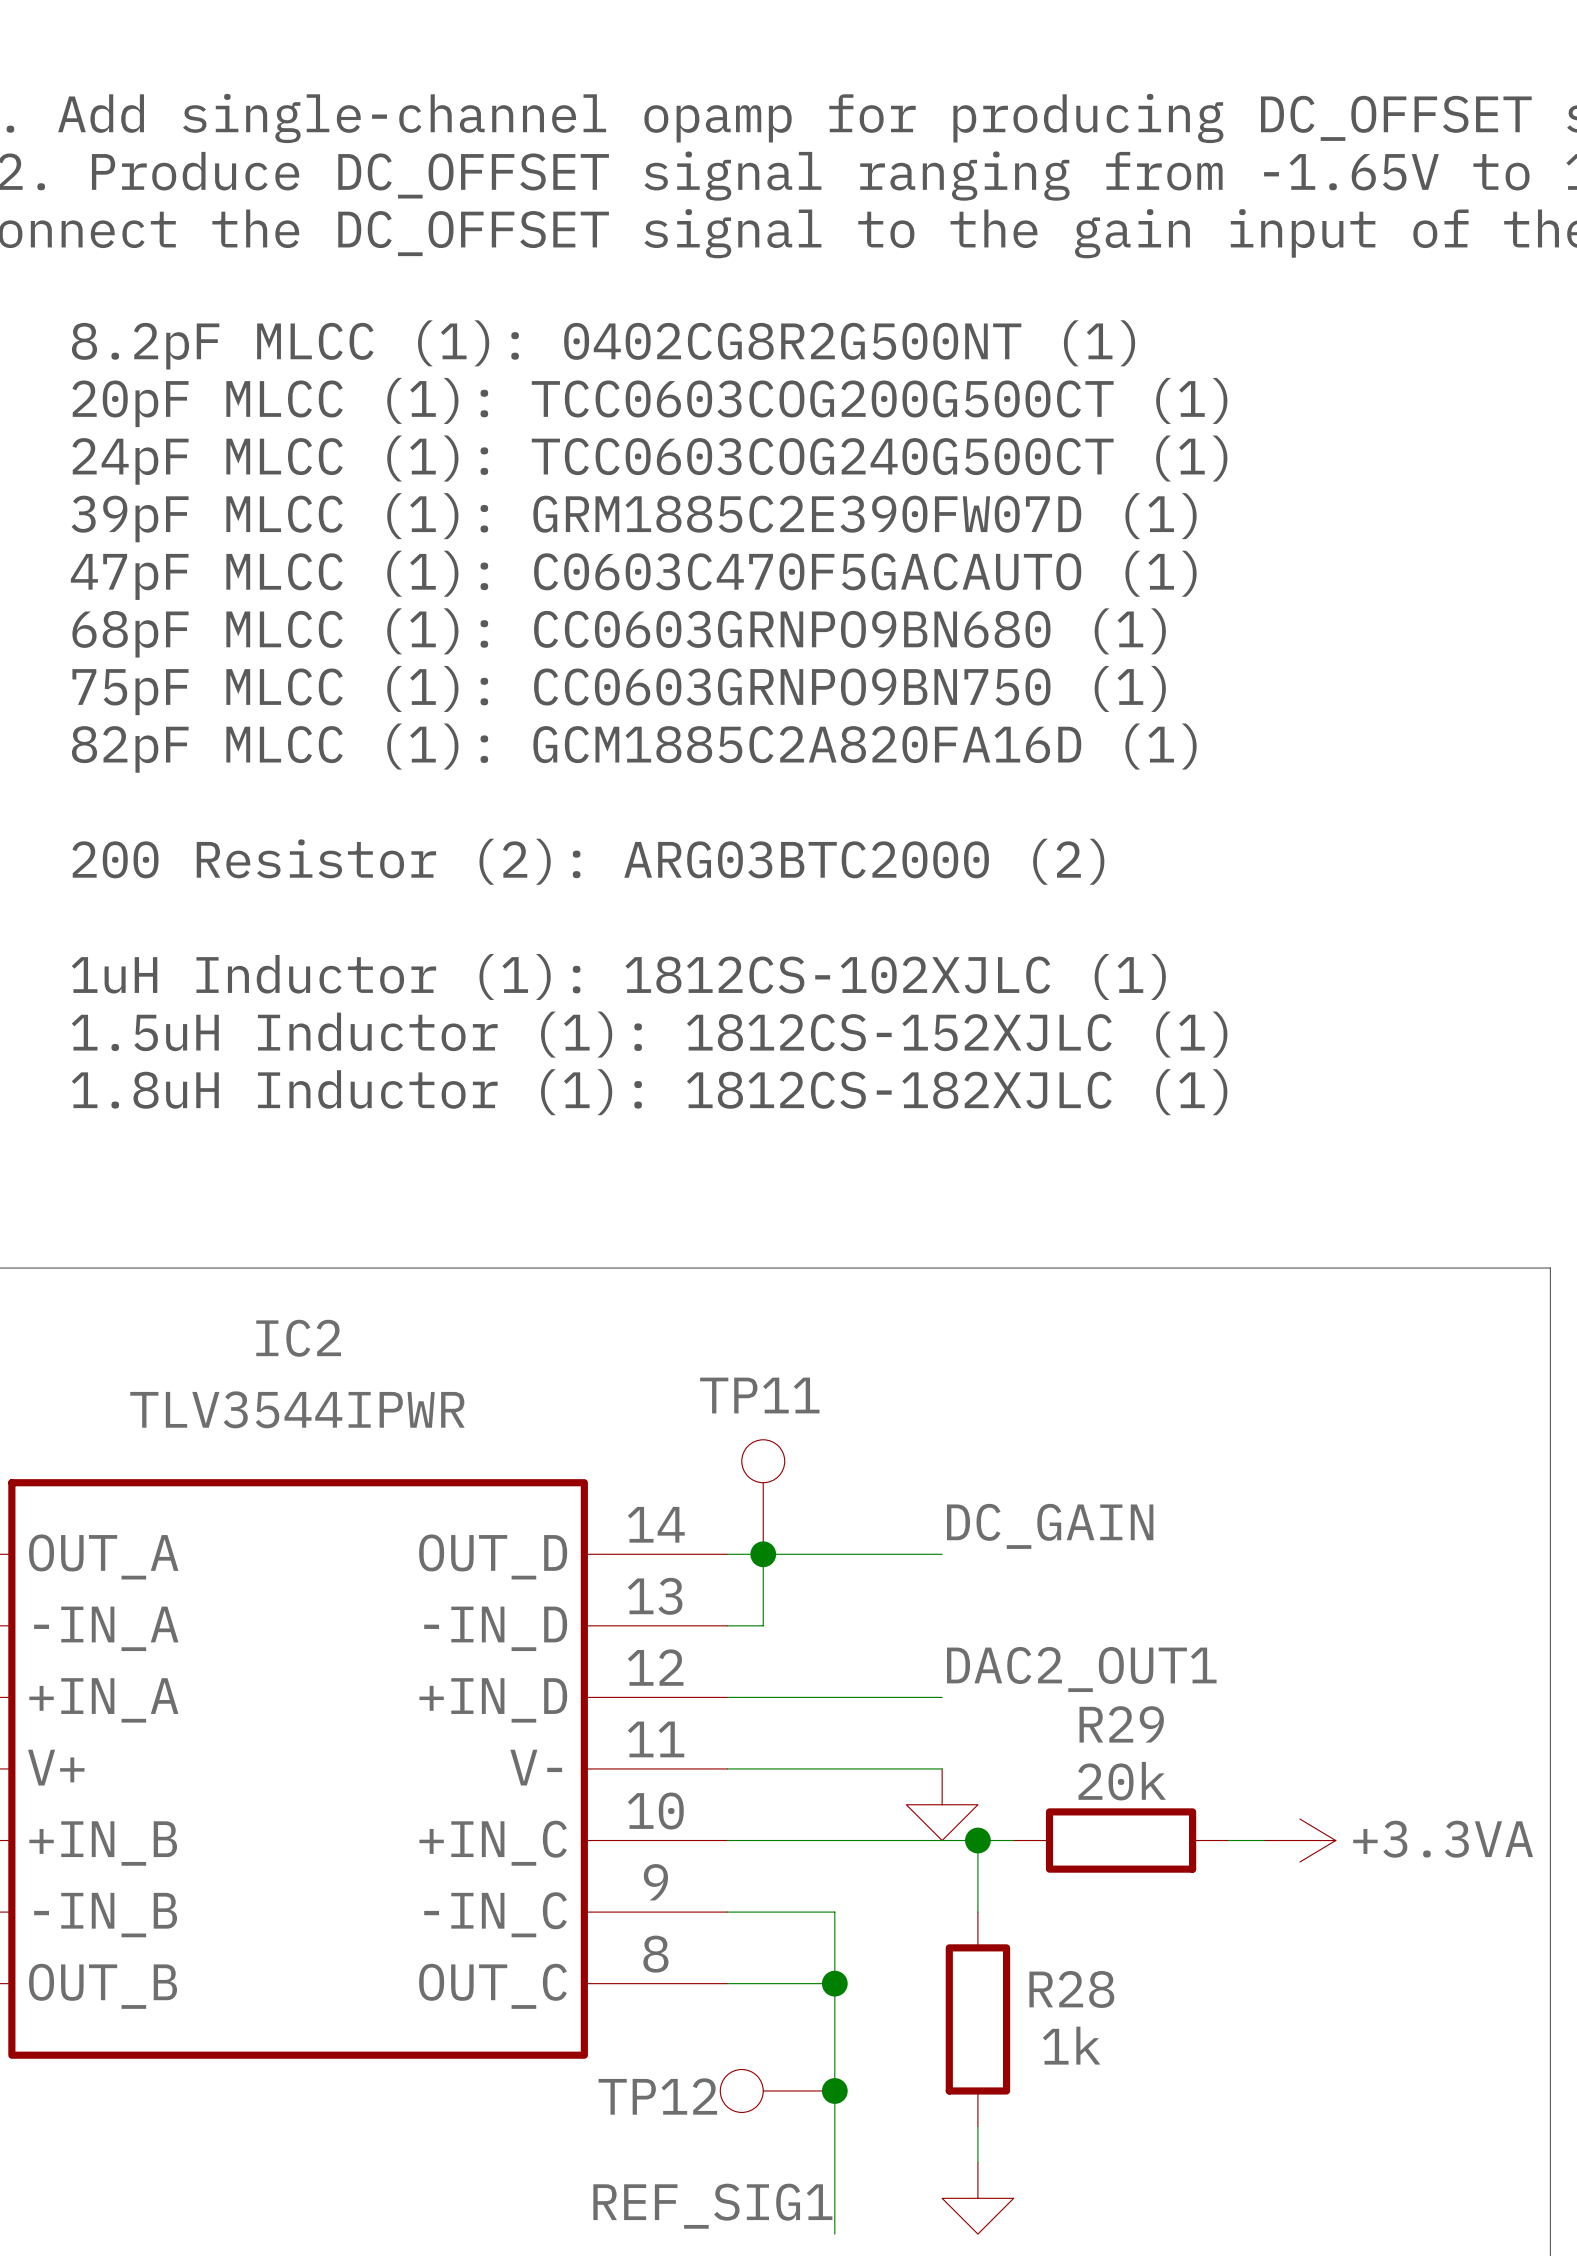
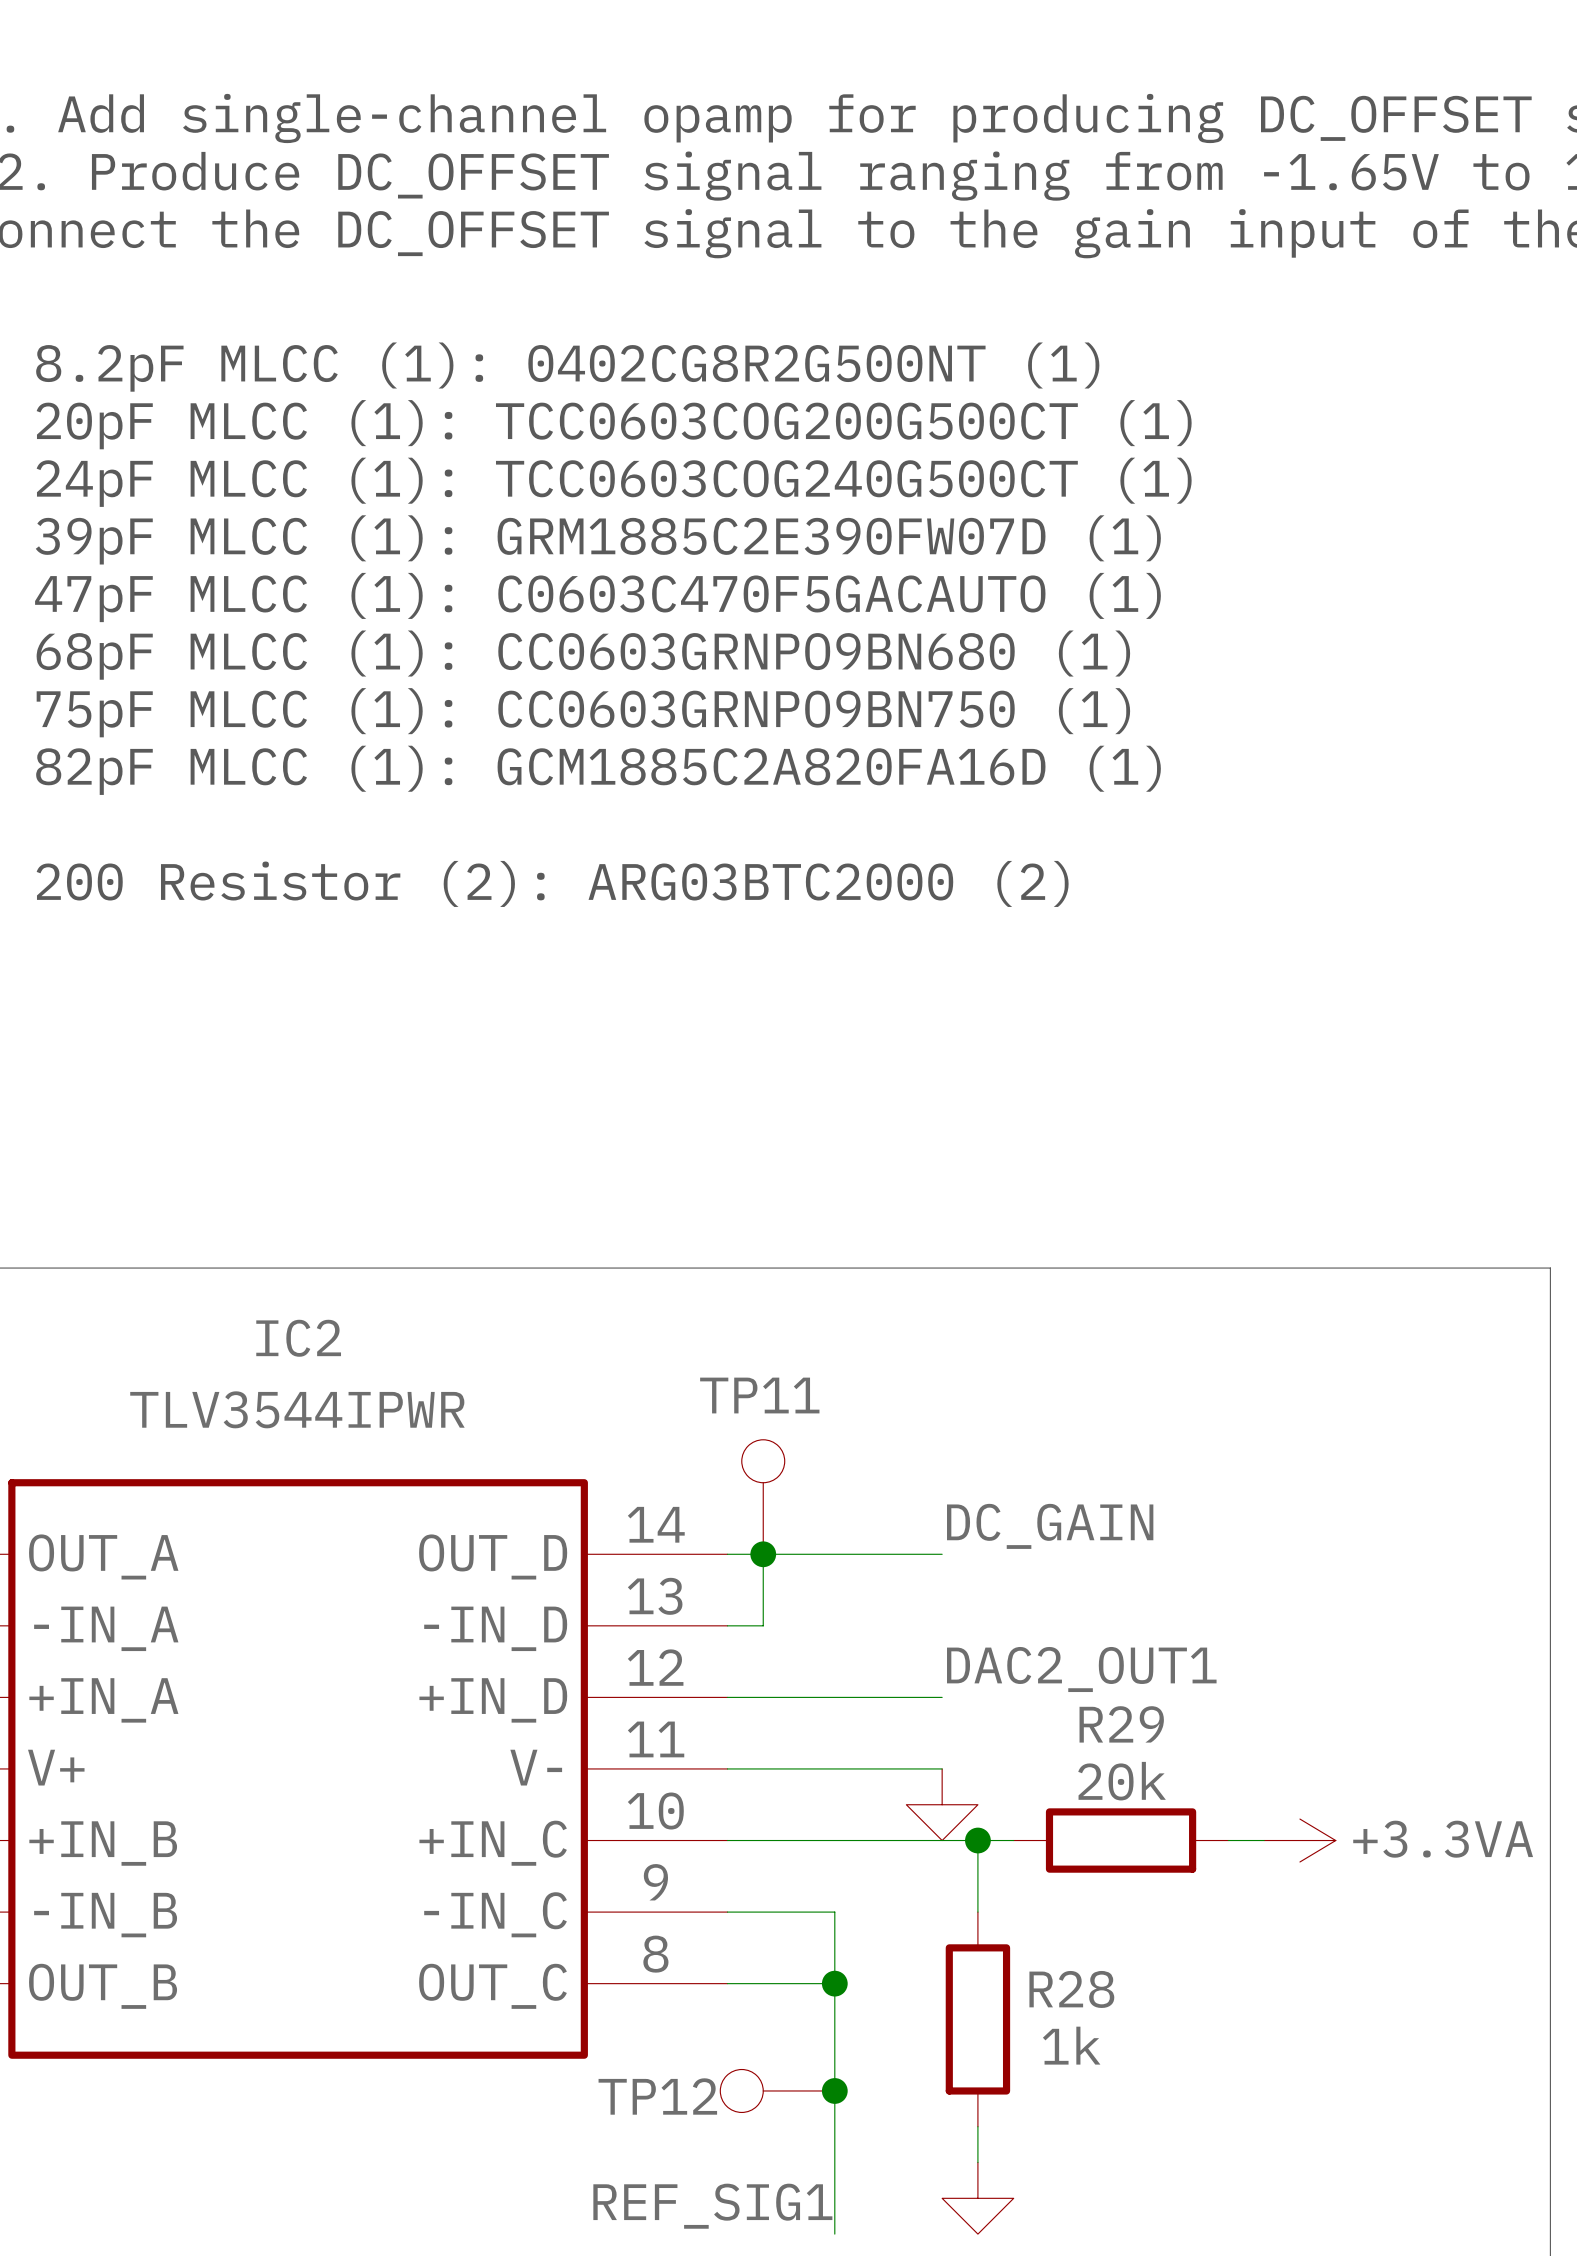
text position: 8.2pF MLCC (1): 0402CG8R2G500NT (1) (603, 344) -> 8.2pF MLCC (1): 0402CG8R2G500NT (1) (567, 367)
text position: 20pF MLCC (1): TCC0603COG200G500CT (1) (649, 402) -> 20pF MLCC (1): TCC0603COG200G500CT (1) (614, 424)
text position: 24pF MLCC (1): TCC0603COG240G500CT (1) (649, 460) -> 24pF MLCC (1): TCC0603COG240G500CT (1) (614, 482)
text position: 39pF MLCC (1): GRM1885C2E390FW07D (1) (634, 517) -> 39pF MLCC (1): GRM1885C2E390FW07D (1) (598, 539)
text position: 47pF MLCC (1): C0603C470F5GACAUTO (1) (633, 575) -> 47pF MLCC (1): C0603C470F5GACAUTO (1) (597, 597)
text position: 68pF MLCC (1): CC0603GRNPO9BN680 (1) (619, 632) -> 68pF MLCC (1): CC0603GRNPO9BN680 (1) (583, 655)
text position: 75pF MLCC (1): CC0603GRNPO9BN750 (1) (619, 690) -> 75pF MLCC (1): CC0603GRNPO9BN750 (1) (583, 712)
text position: 82pF MLCC (1): GCM1885C2A820FA16D (1) (634, 748) -> 82pF MLCC (1): GCM1885C2A820FA16D (1) (598, 770)
text position: 200 Resistor (2): ARG03BTC2000 (2) (588, 861) -> 200 Resistor (2): ARG03BTC2000 (2) (552, 883)
text: 1uH Inductor (1): 1812CS-102XJLC (1) (618, 976) -> none
text: 1.5uH Inductor (1): 1812CS-152XJLC (1) (649, 1034) -> none
text: 1.8uH Inductor (1): 1812CS-182XJLC (1) (649, 1092) -> none

